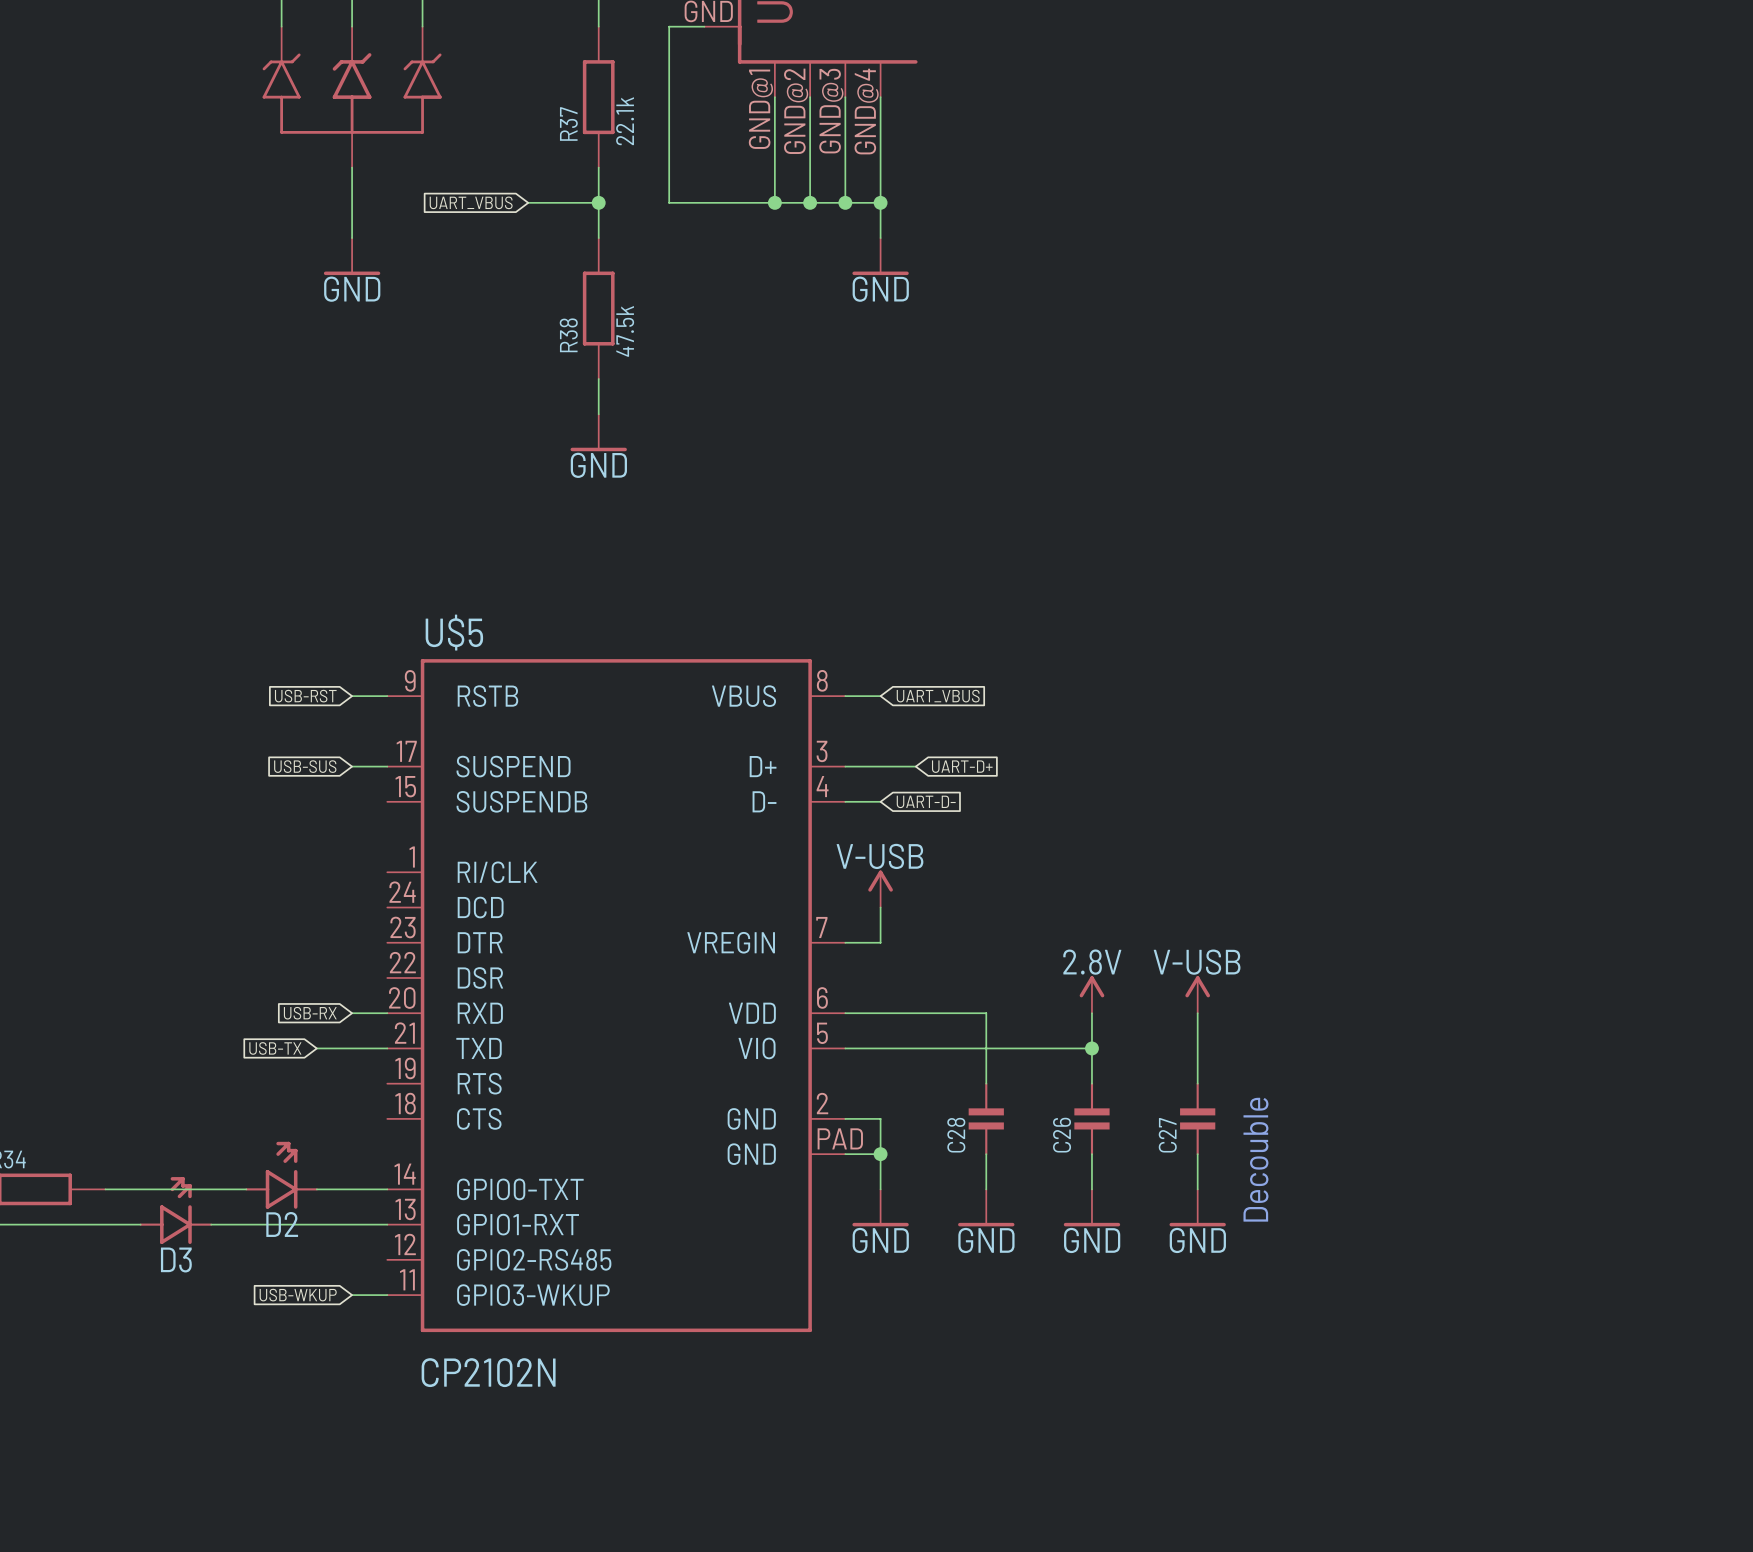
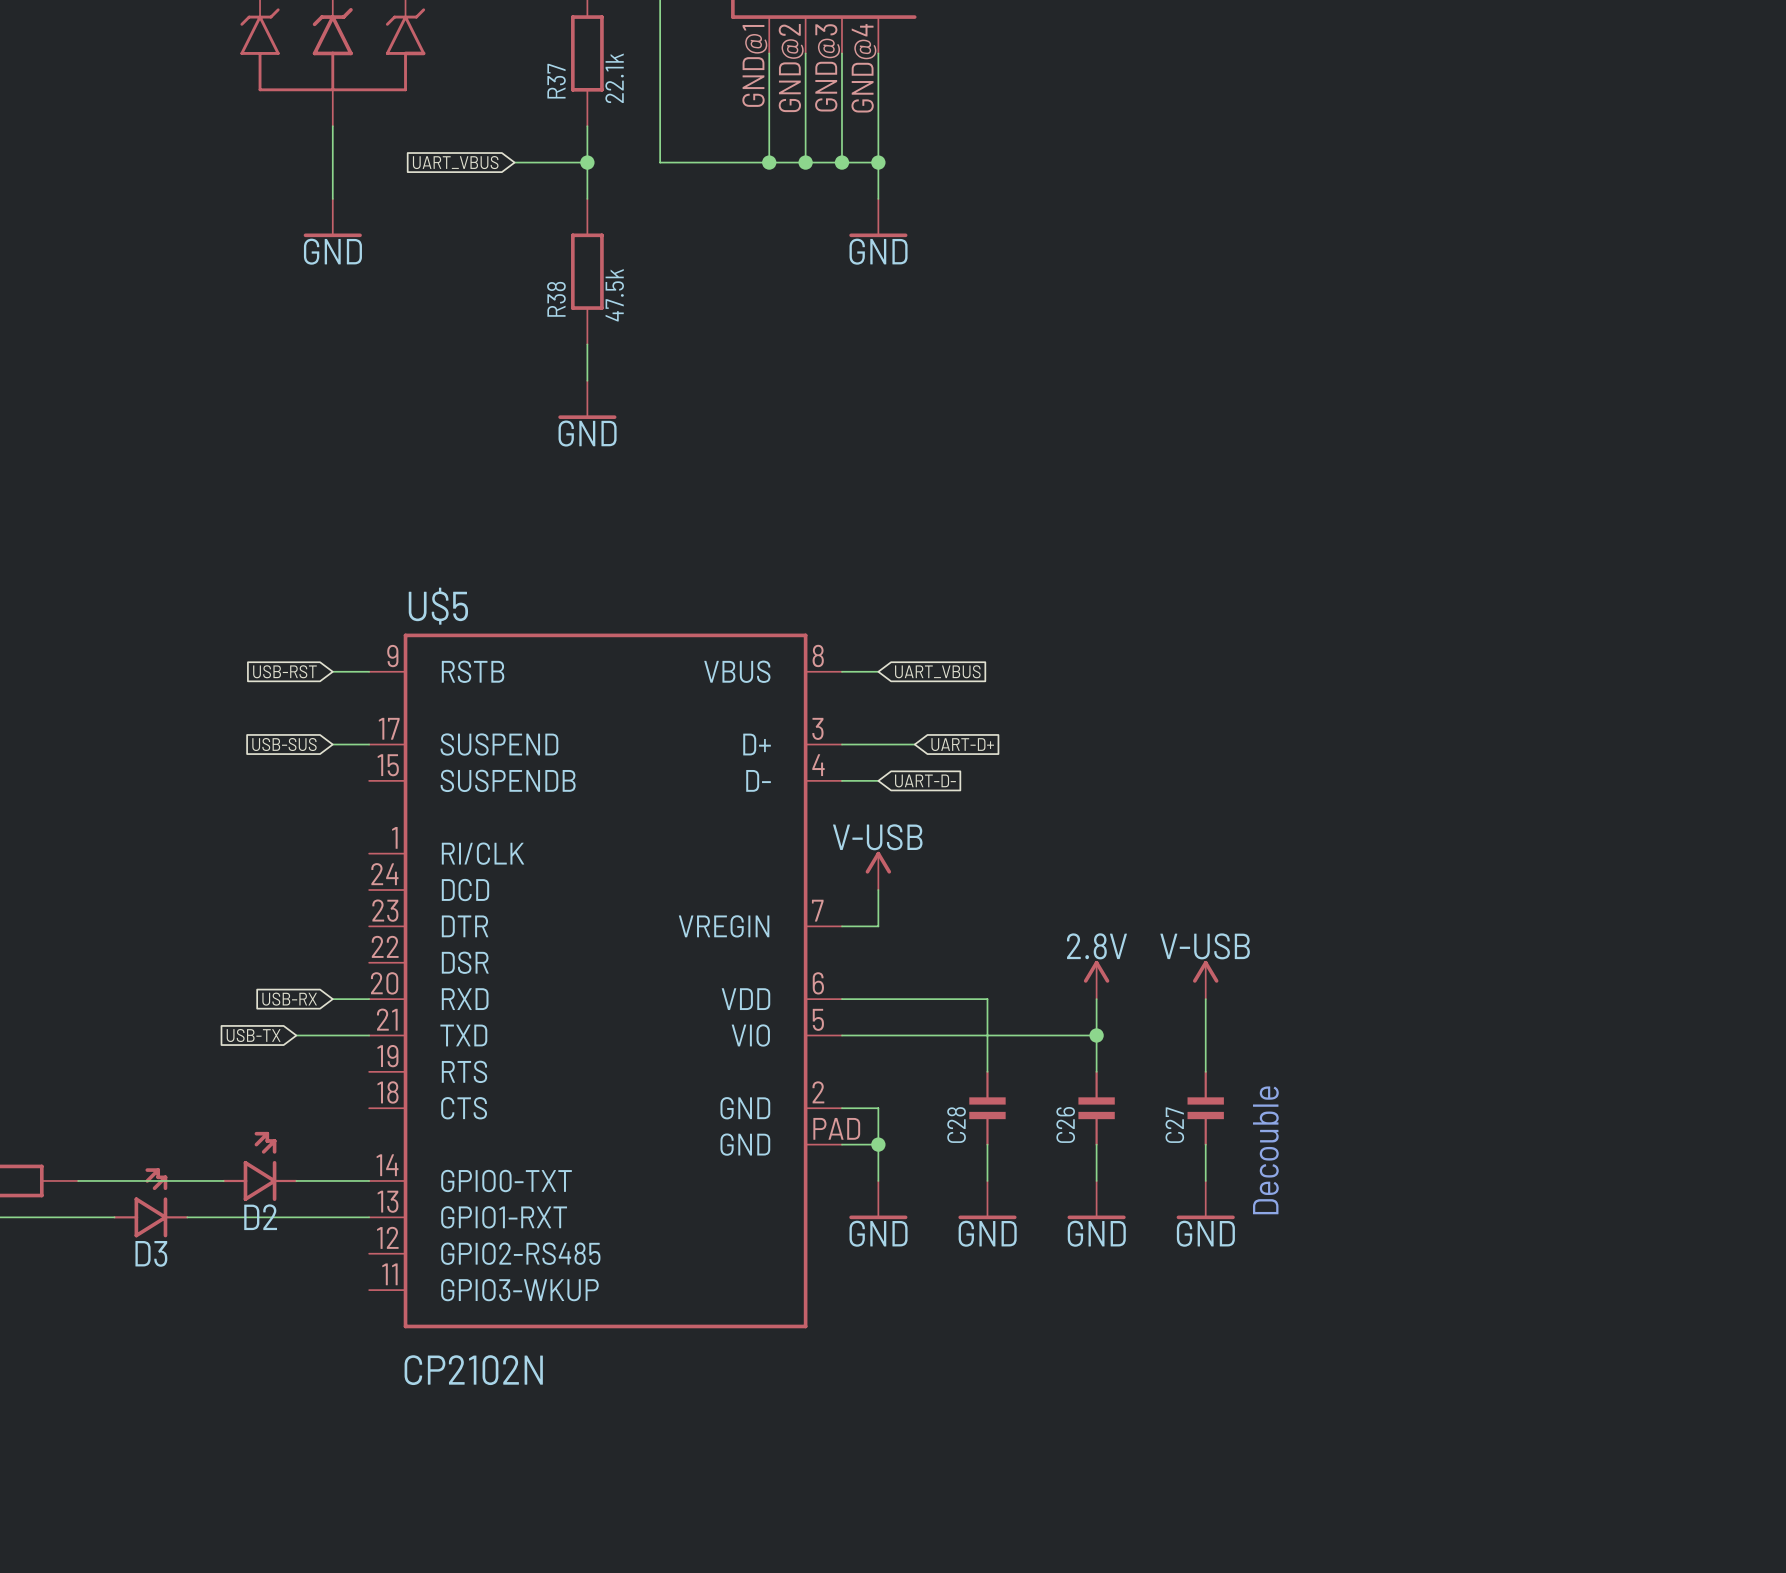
global label: USB-WKUP (298, 1295) -> none
wire: (352, 1295) (387, 1295) -> none

